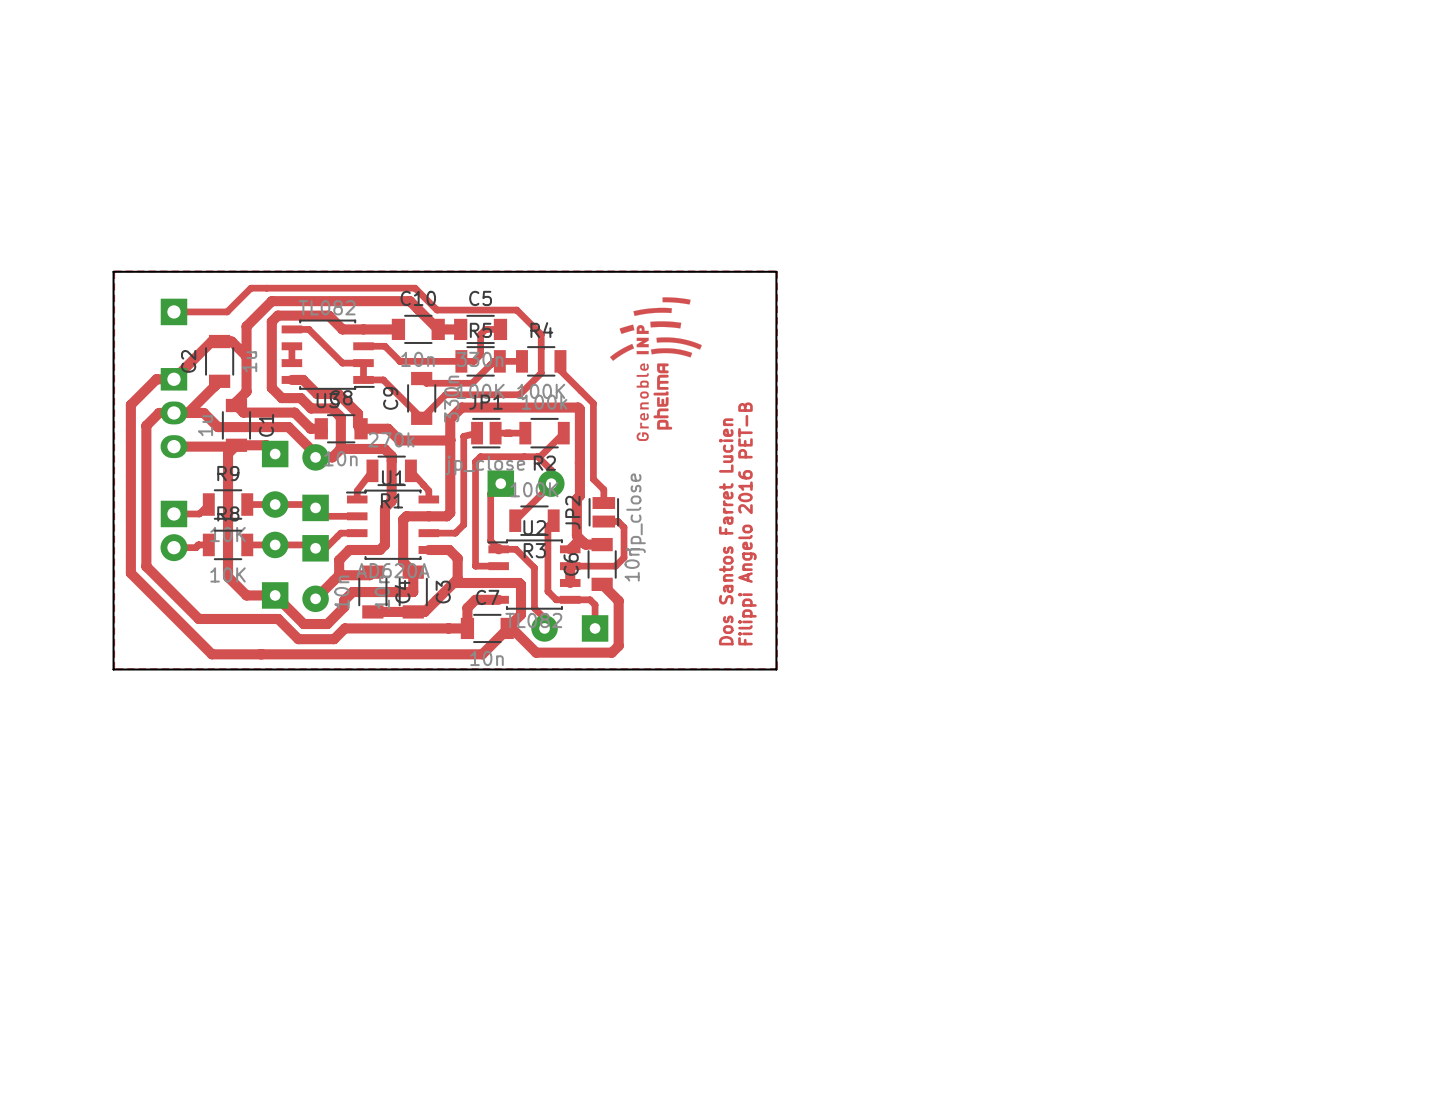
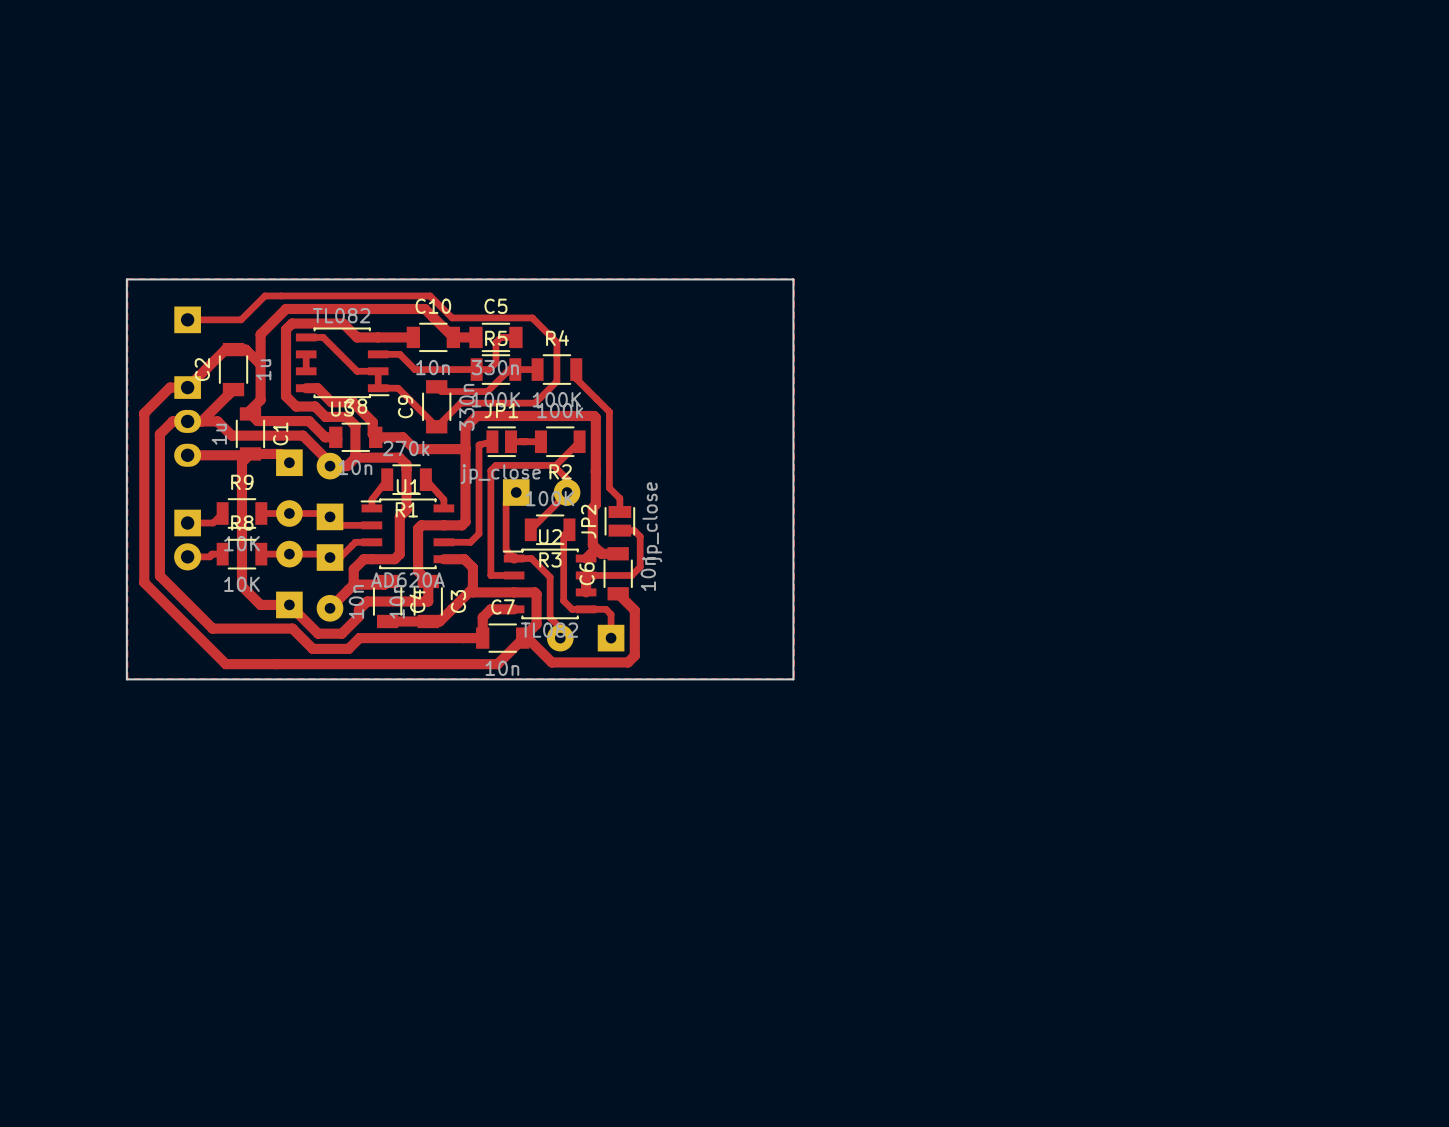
drawing: [609, 297, 702, 442] -> none
text: Filippi Angelo 2016 PET-B (747, 523) -> none
text: Dos Santos Farret Lucien (726, 531) -> none

